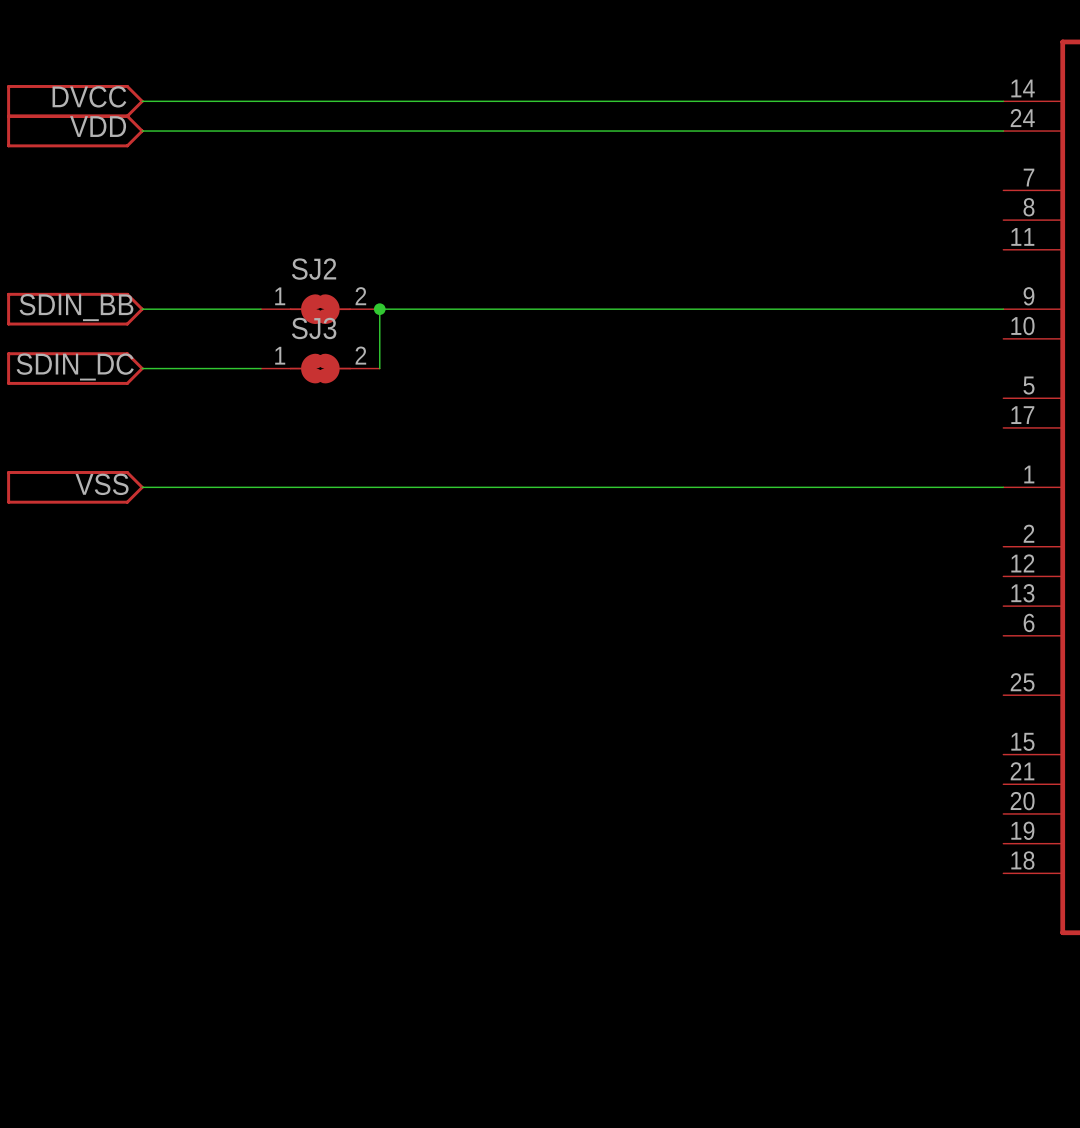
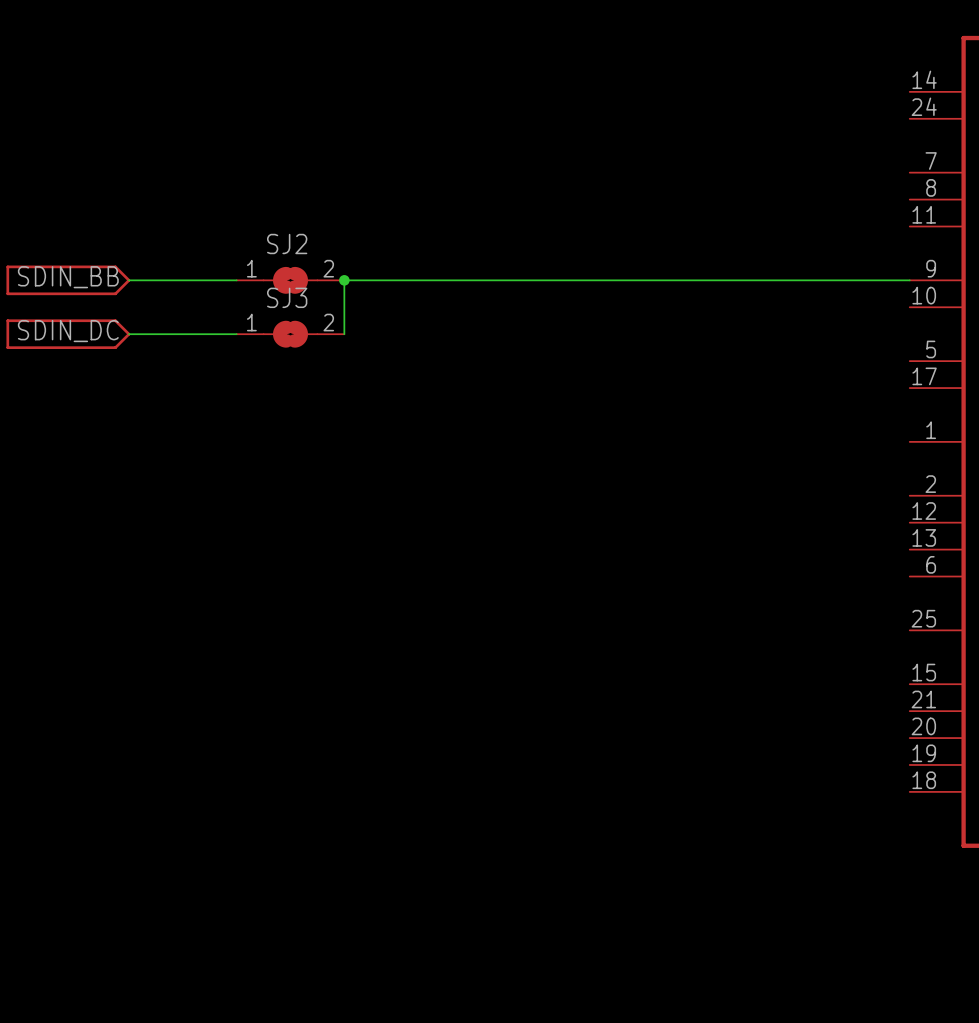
label: DVCC (89, 96) -> none
part: (75, 101) -> none
wire: (142, 101) (1003, 101) -> none
label: VDD (98, 126) -> none
part: (75, 131) -> none
wire: (142, 131) (1003, 131) -> none
label: VSS (102, 484) -> none
part: (75, 487) -> none
wire: (142, 487) (1003, 487) -> none

